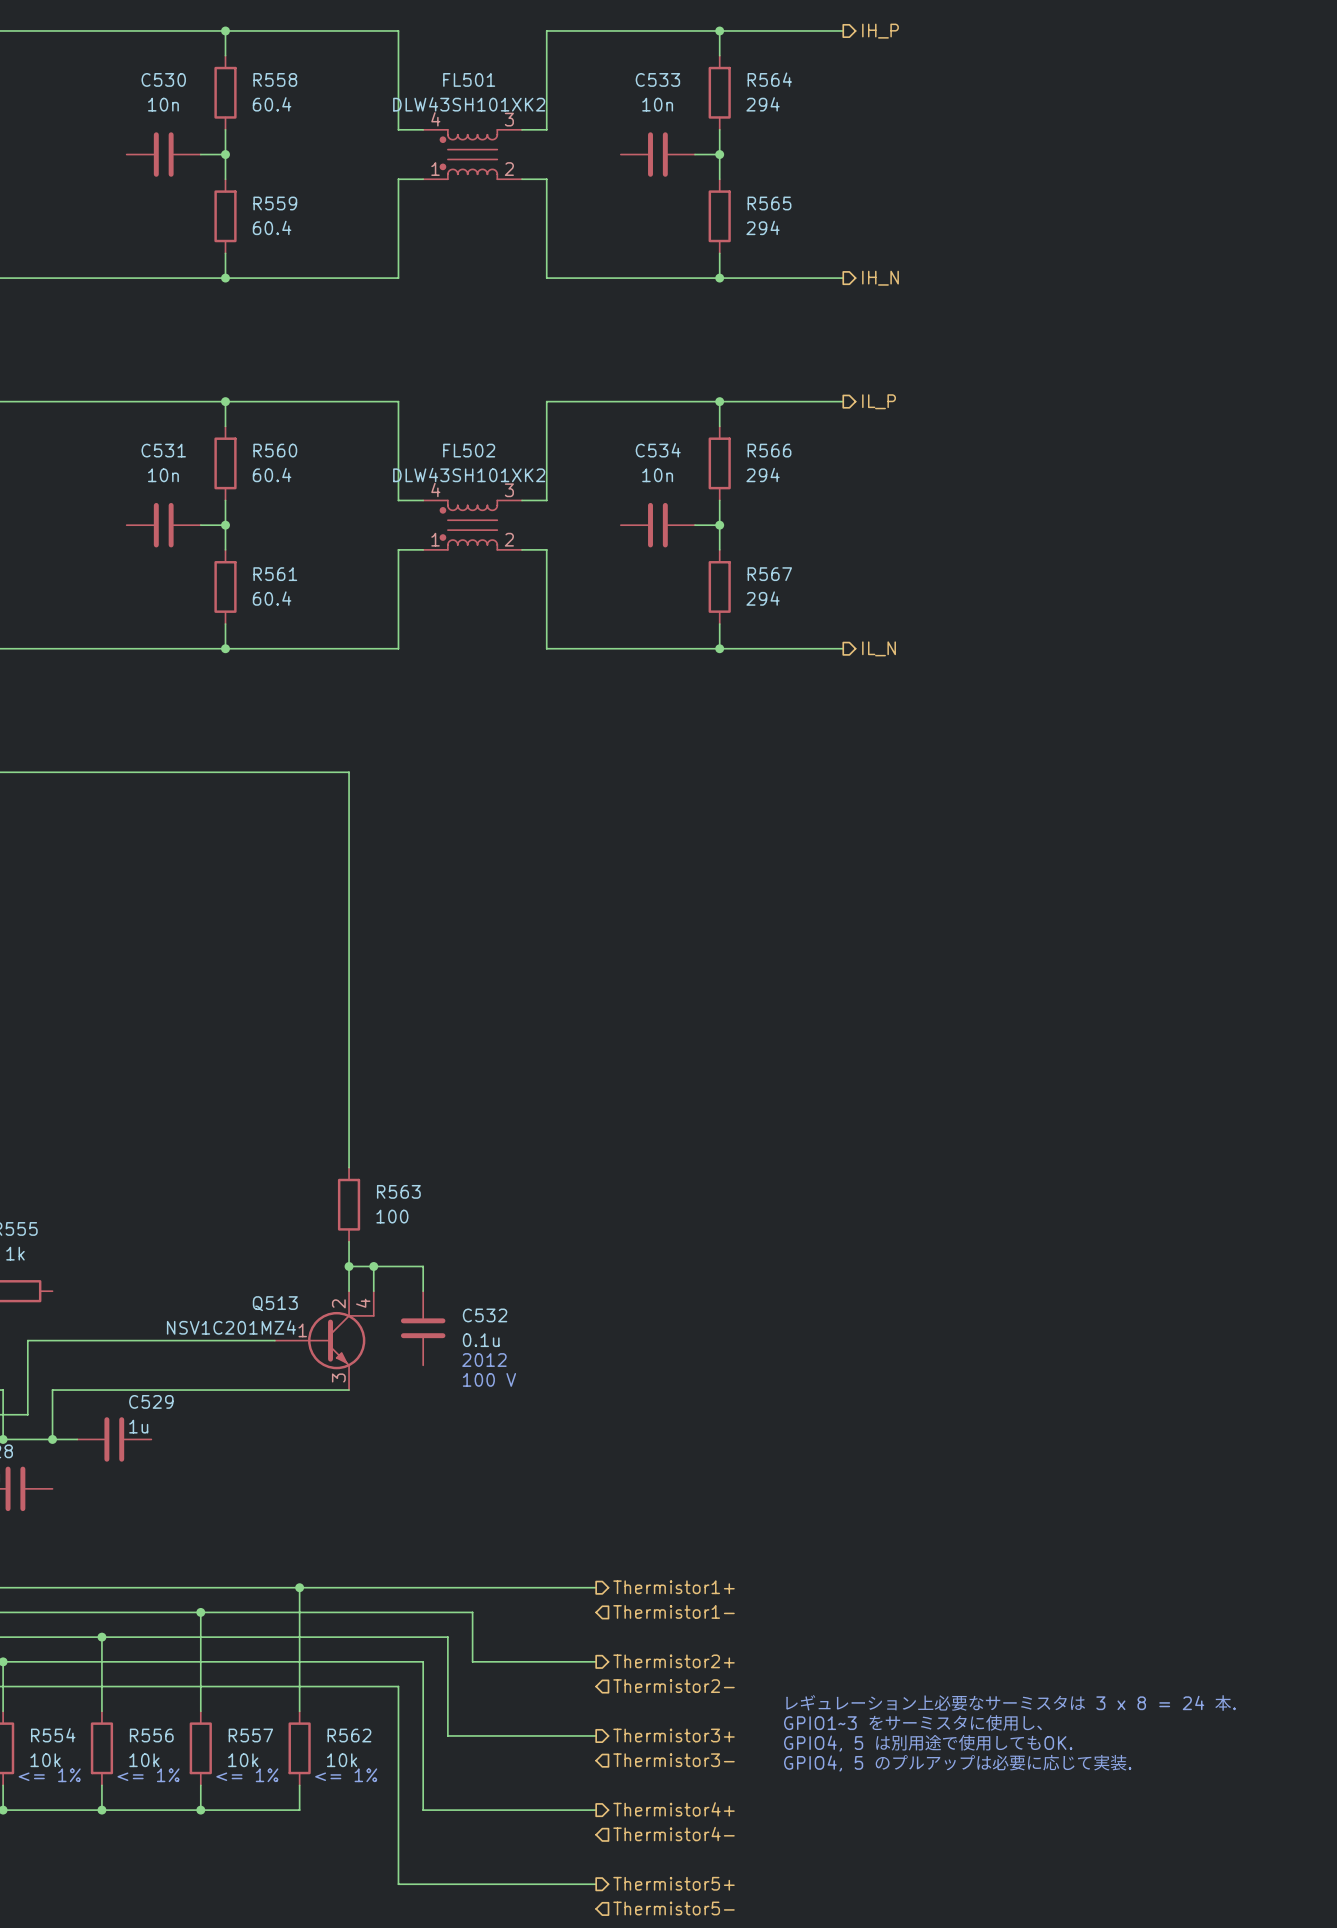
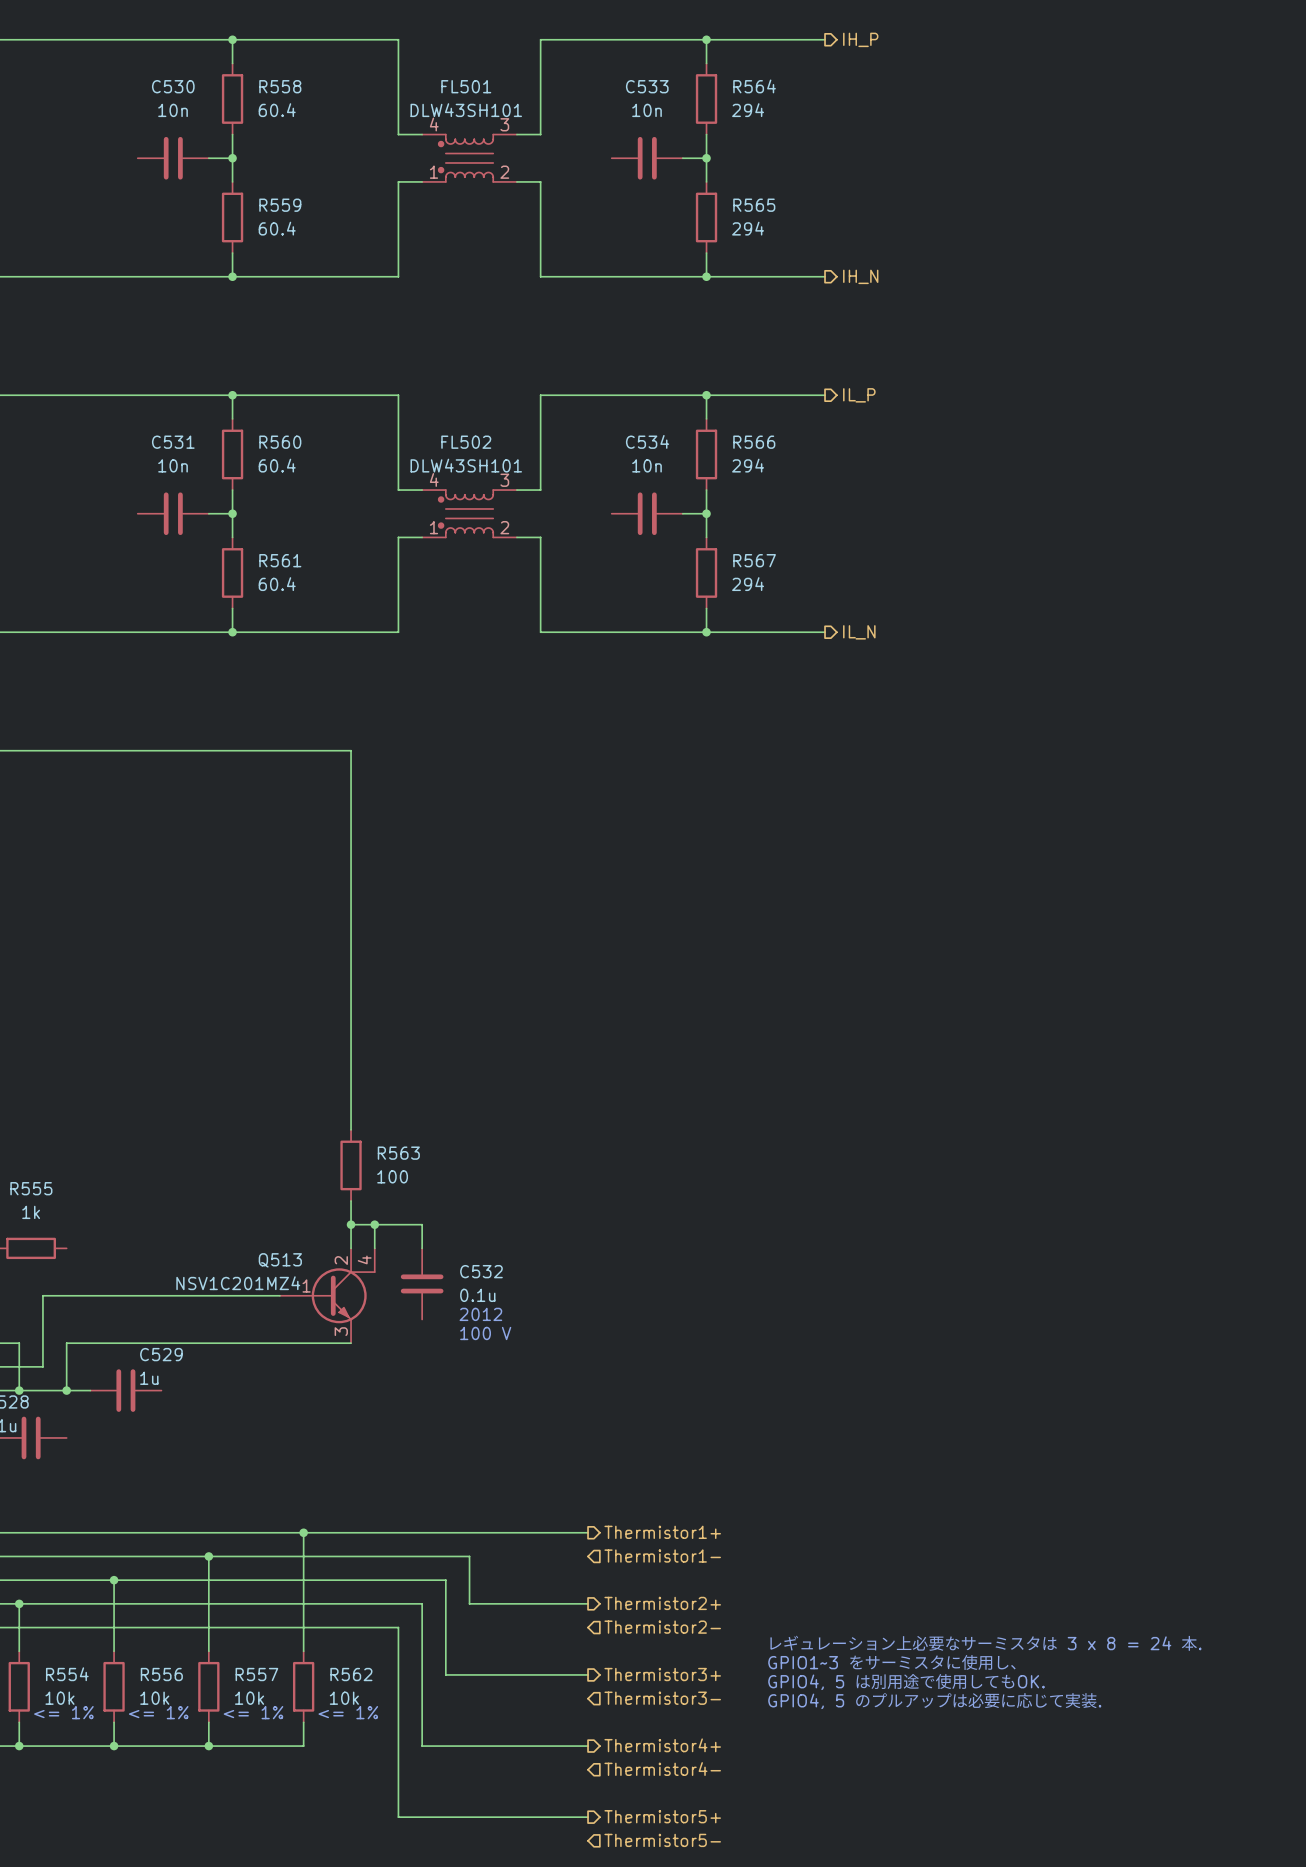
FL501 value: DLW43SH101XK2 (469, 104) -> DLW43SH101 (466, 110)
FL502 value: DLW43SH101XK2 (469, 475) -> DLW43SH101 (466, 465)

